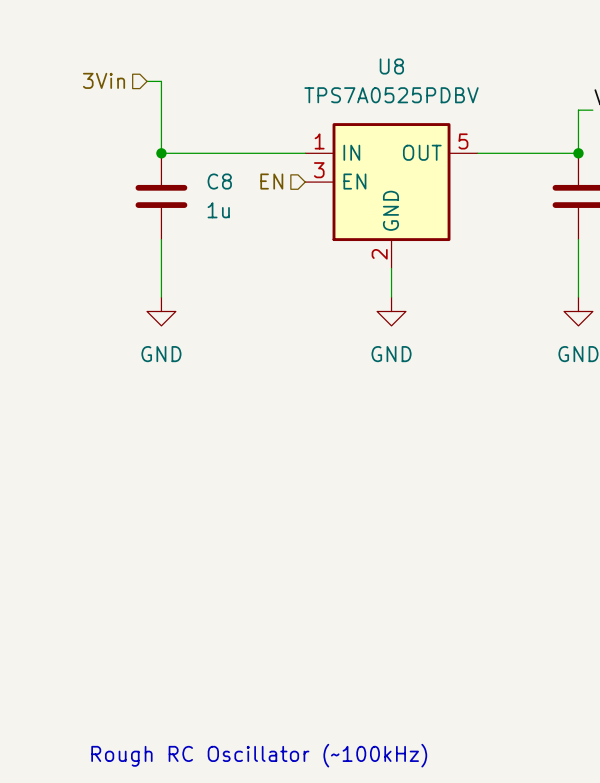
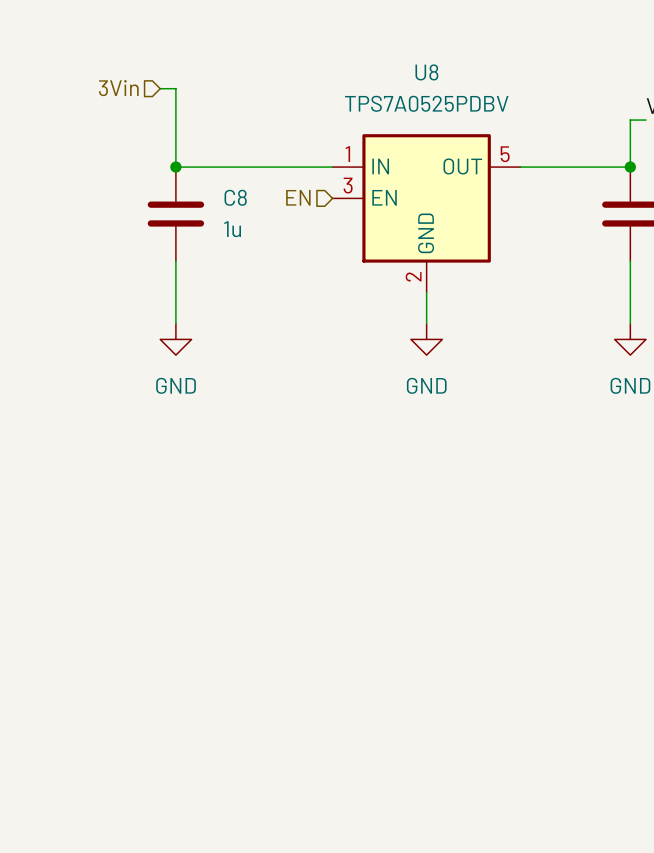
text: Rough RC Oscillator (~100kHz) (259, 755) -> none

